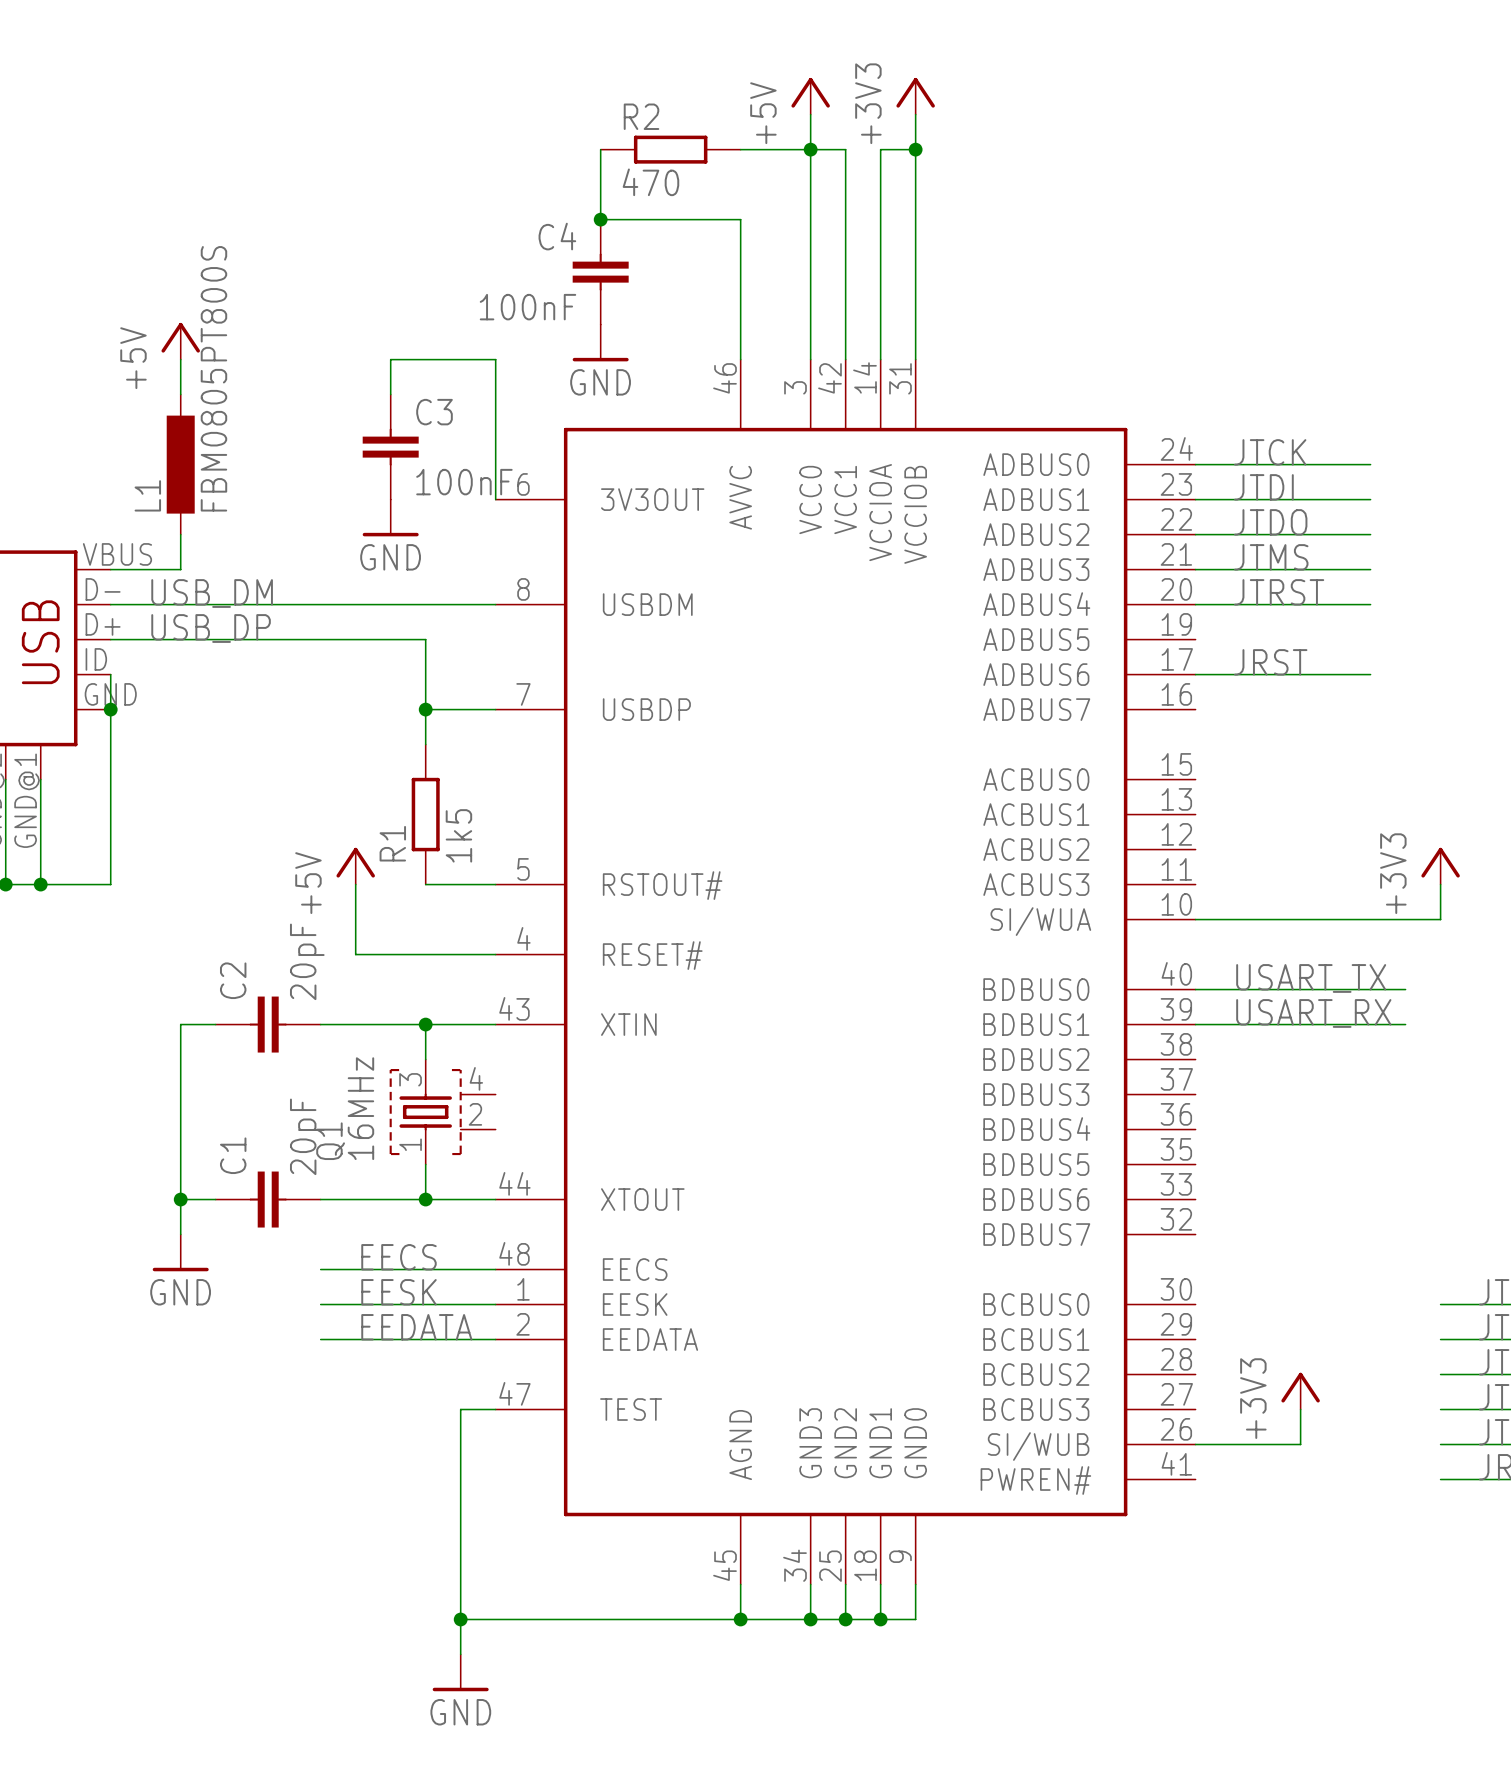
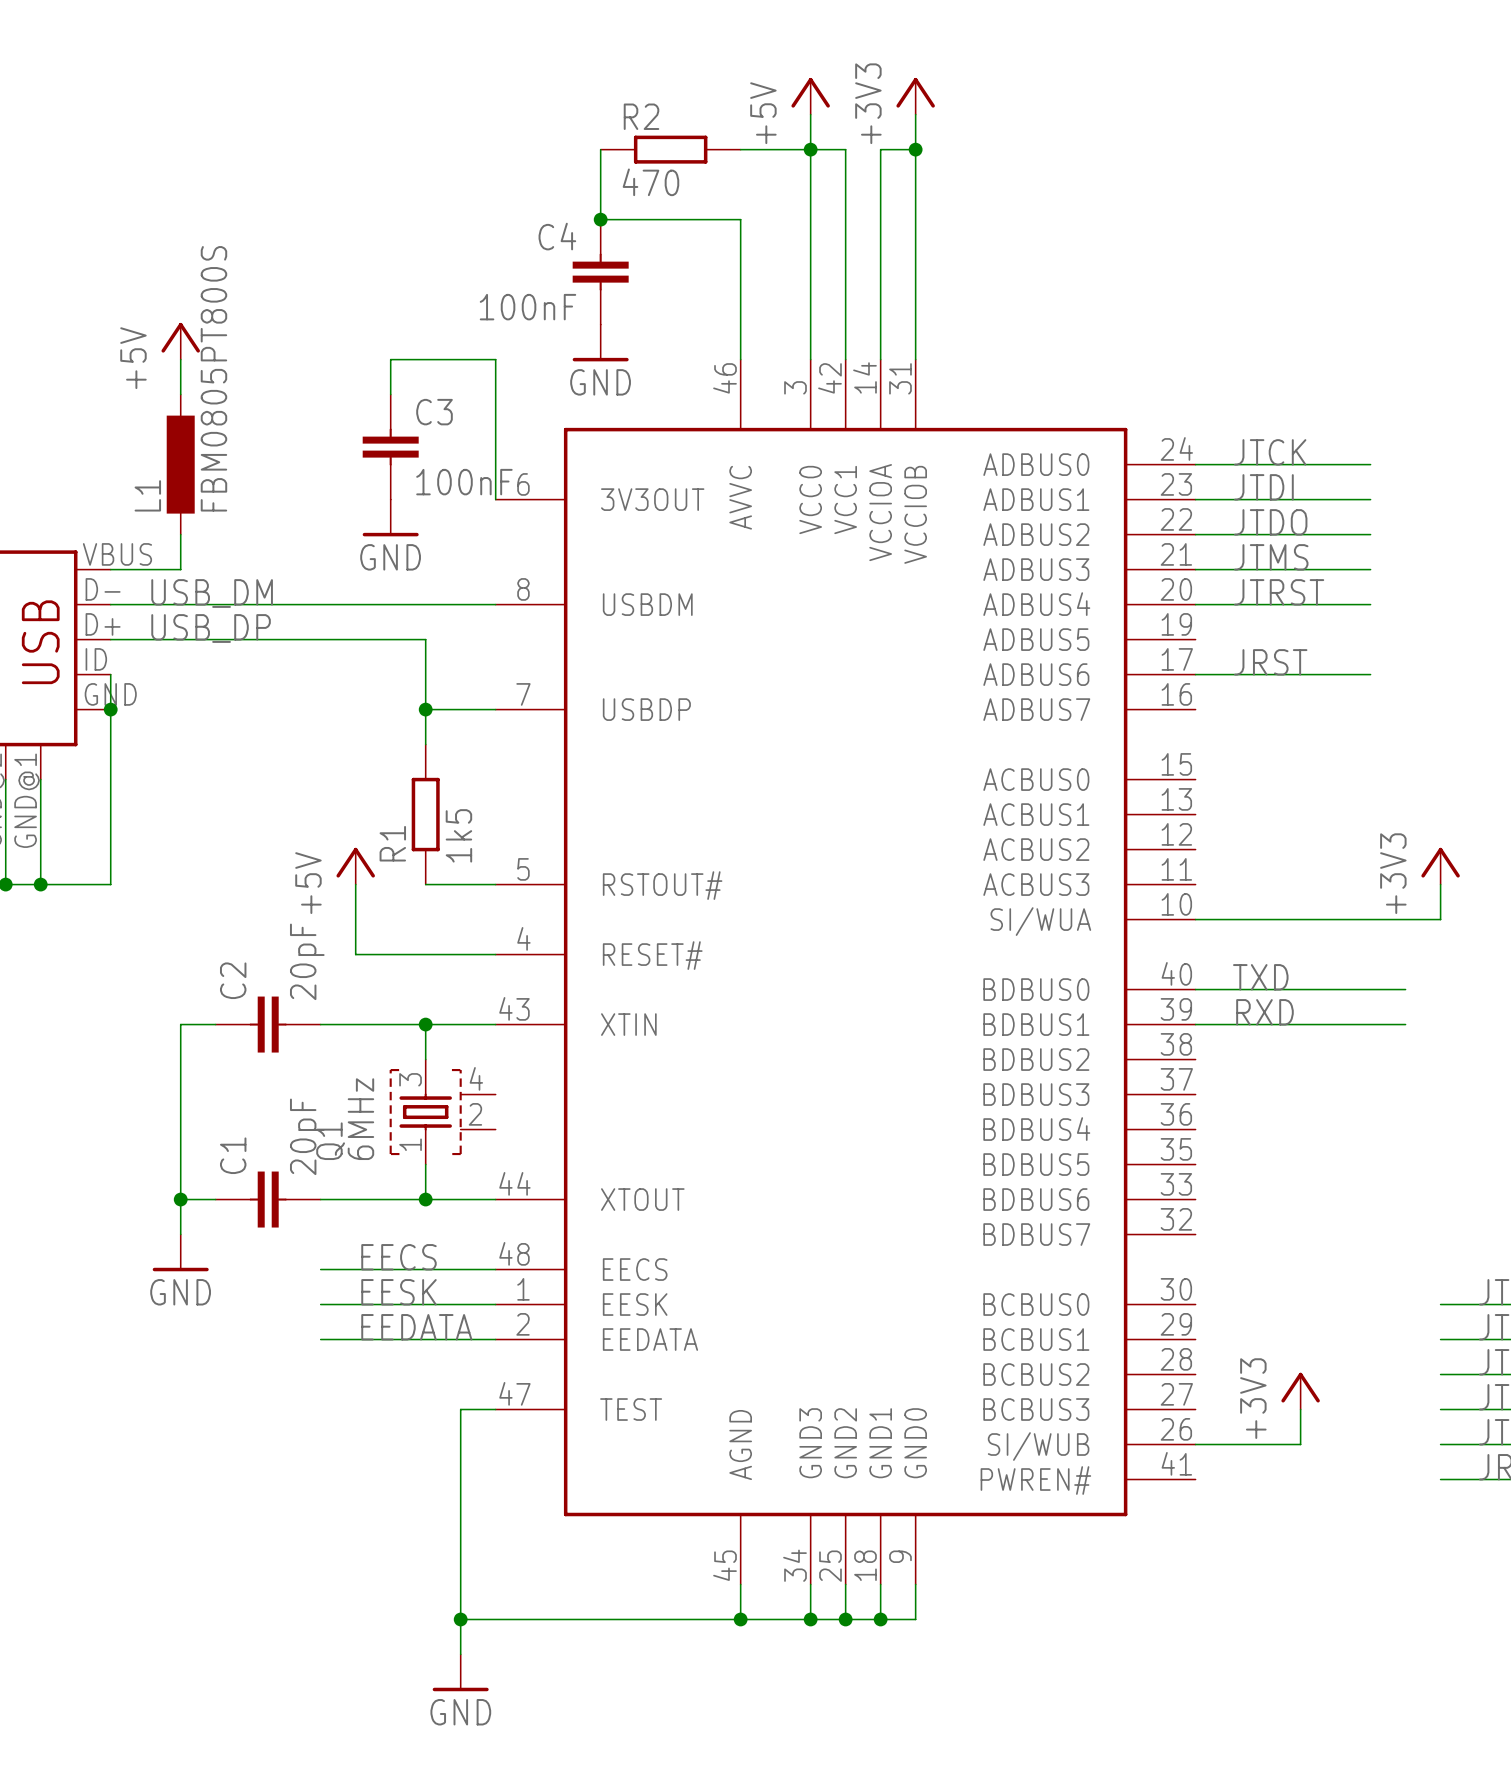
label: USART_TX (1311, 978) -> TXD (1260, 977)
label: USART_RX (1313, 1013) -> RXD (1264, 1012)
Q1 value: 16MHz (360, 1108) -> 6MHz (360, 1119)

